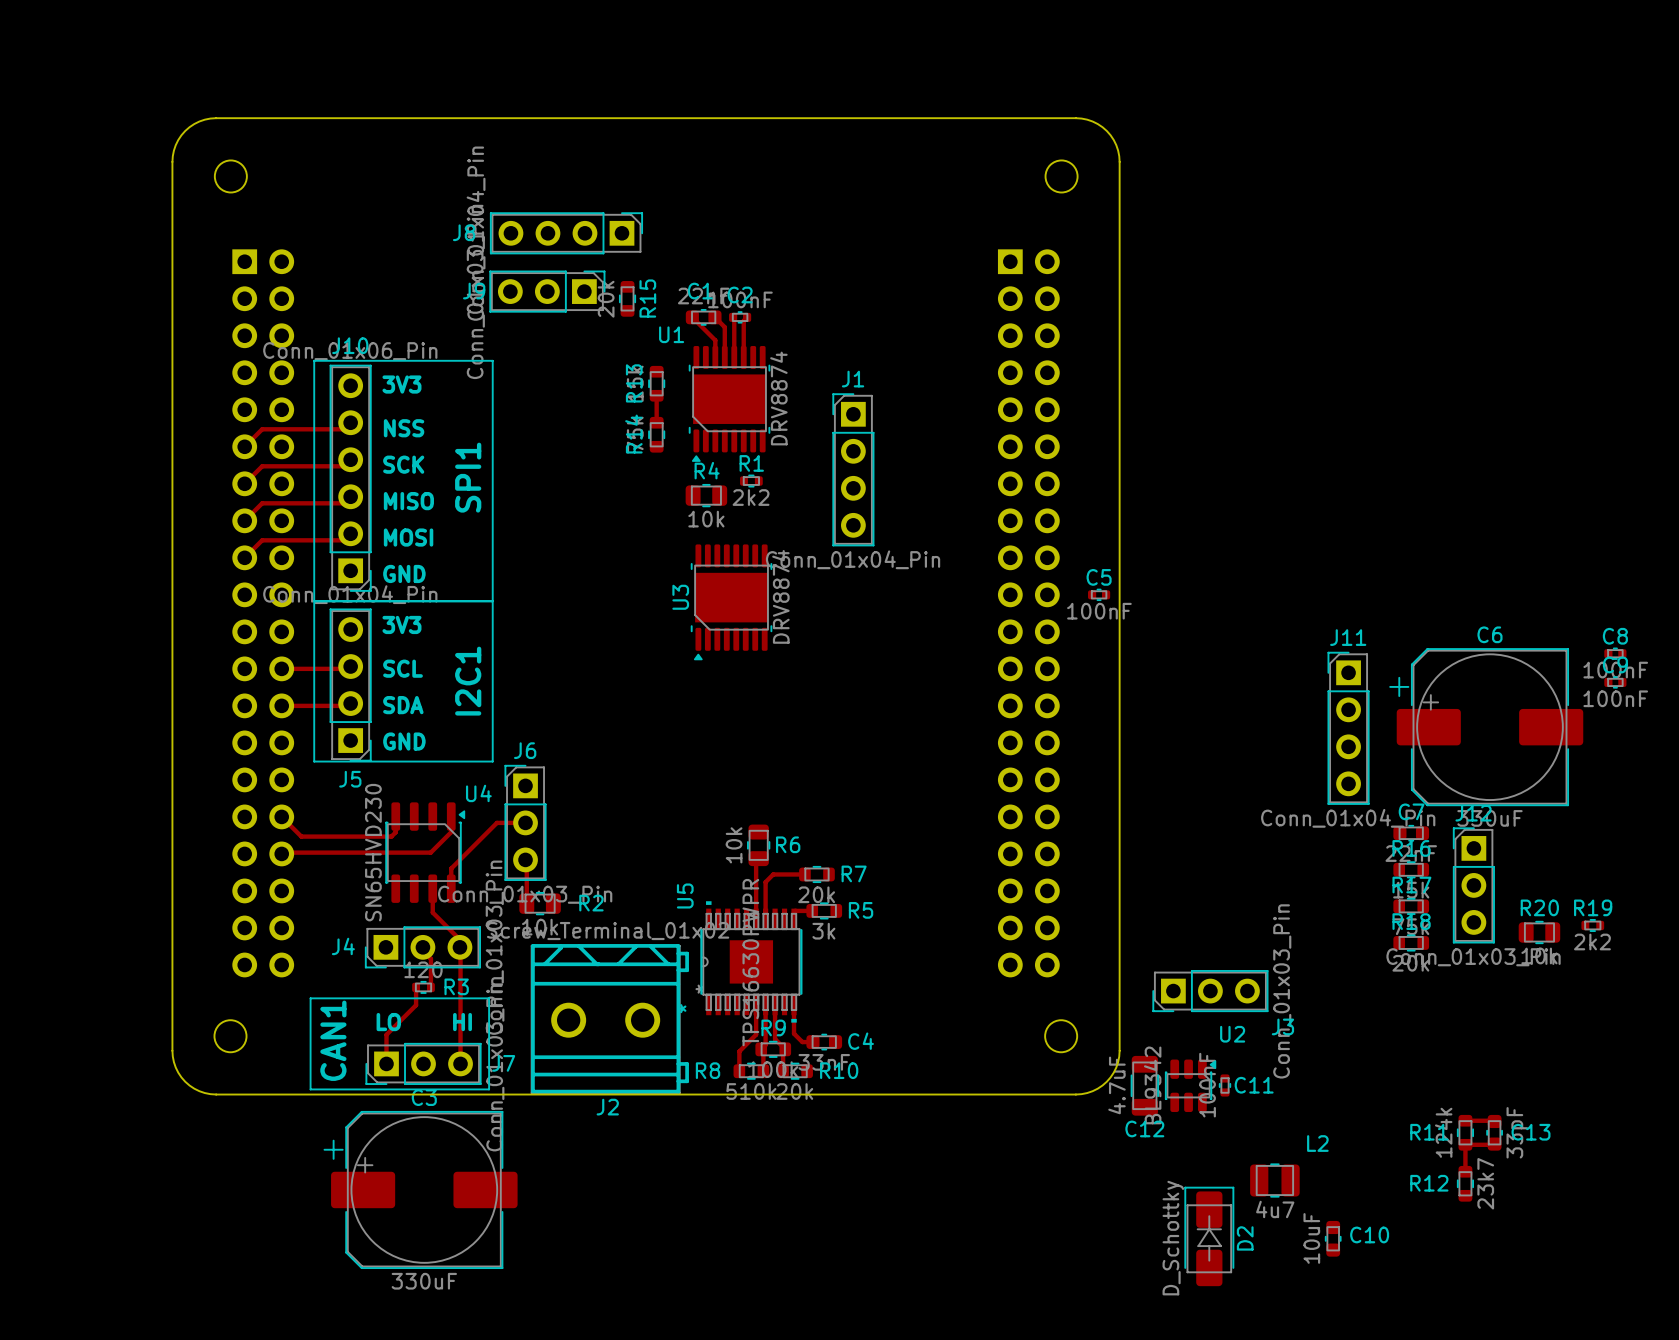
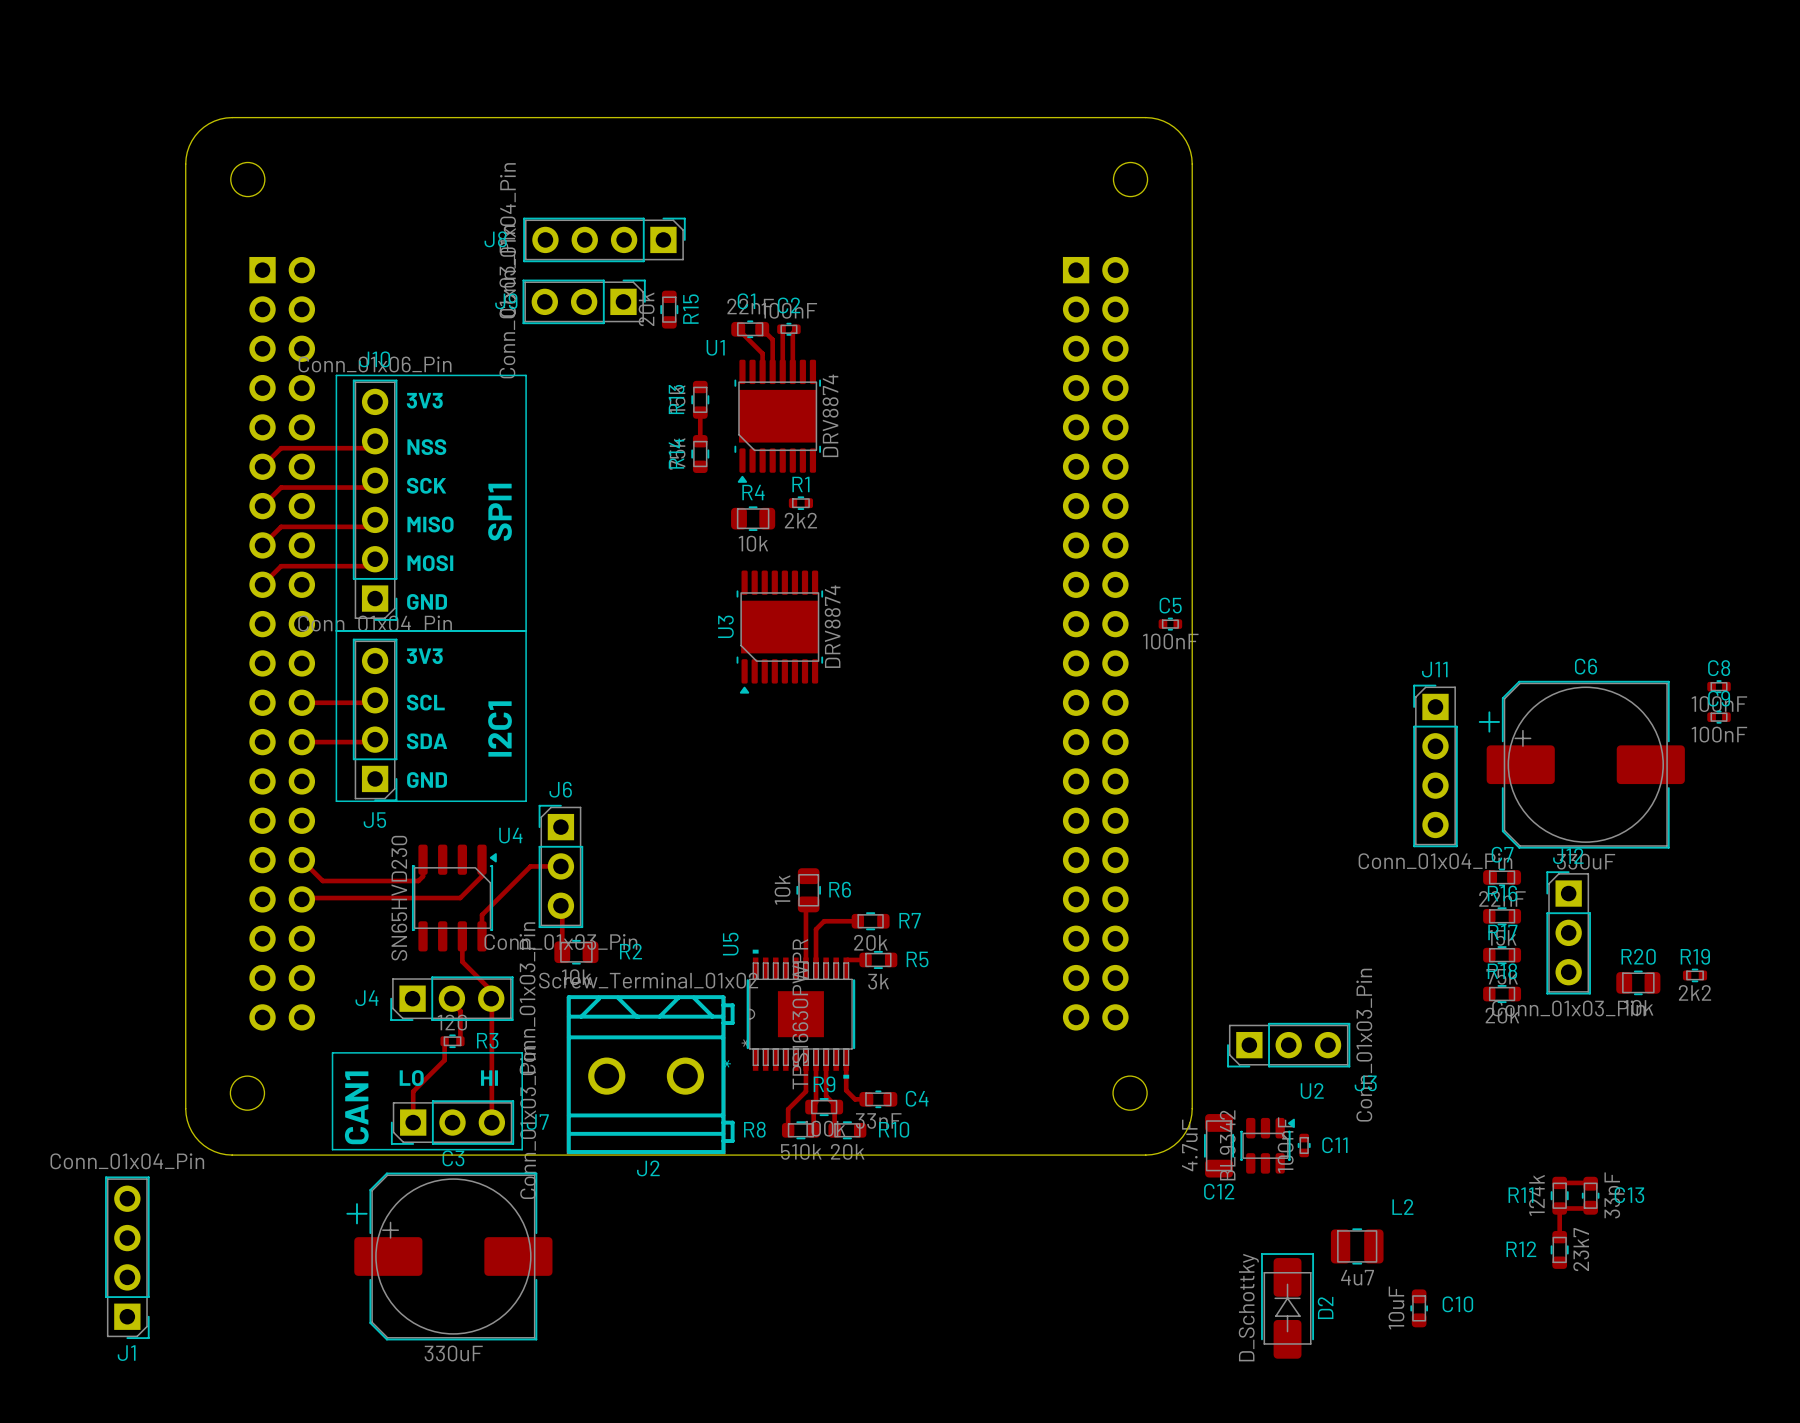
J1 rotation: 0° (853, 469) -> 180° (127, 1257)
J1 position: (853, 469) -> (127, 1257)

